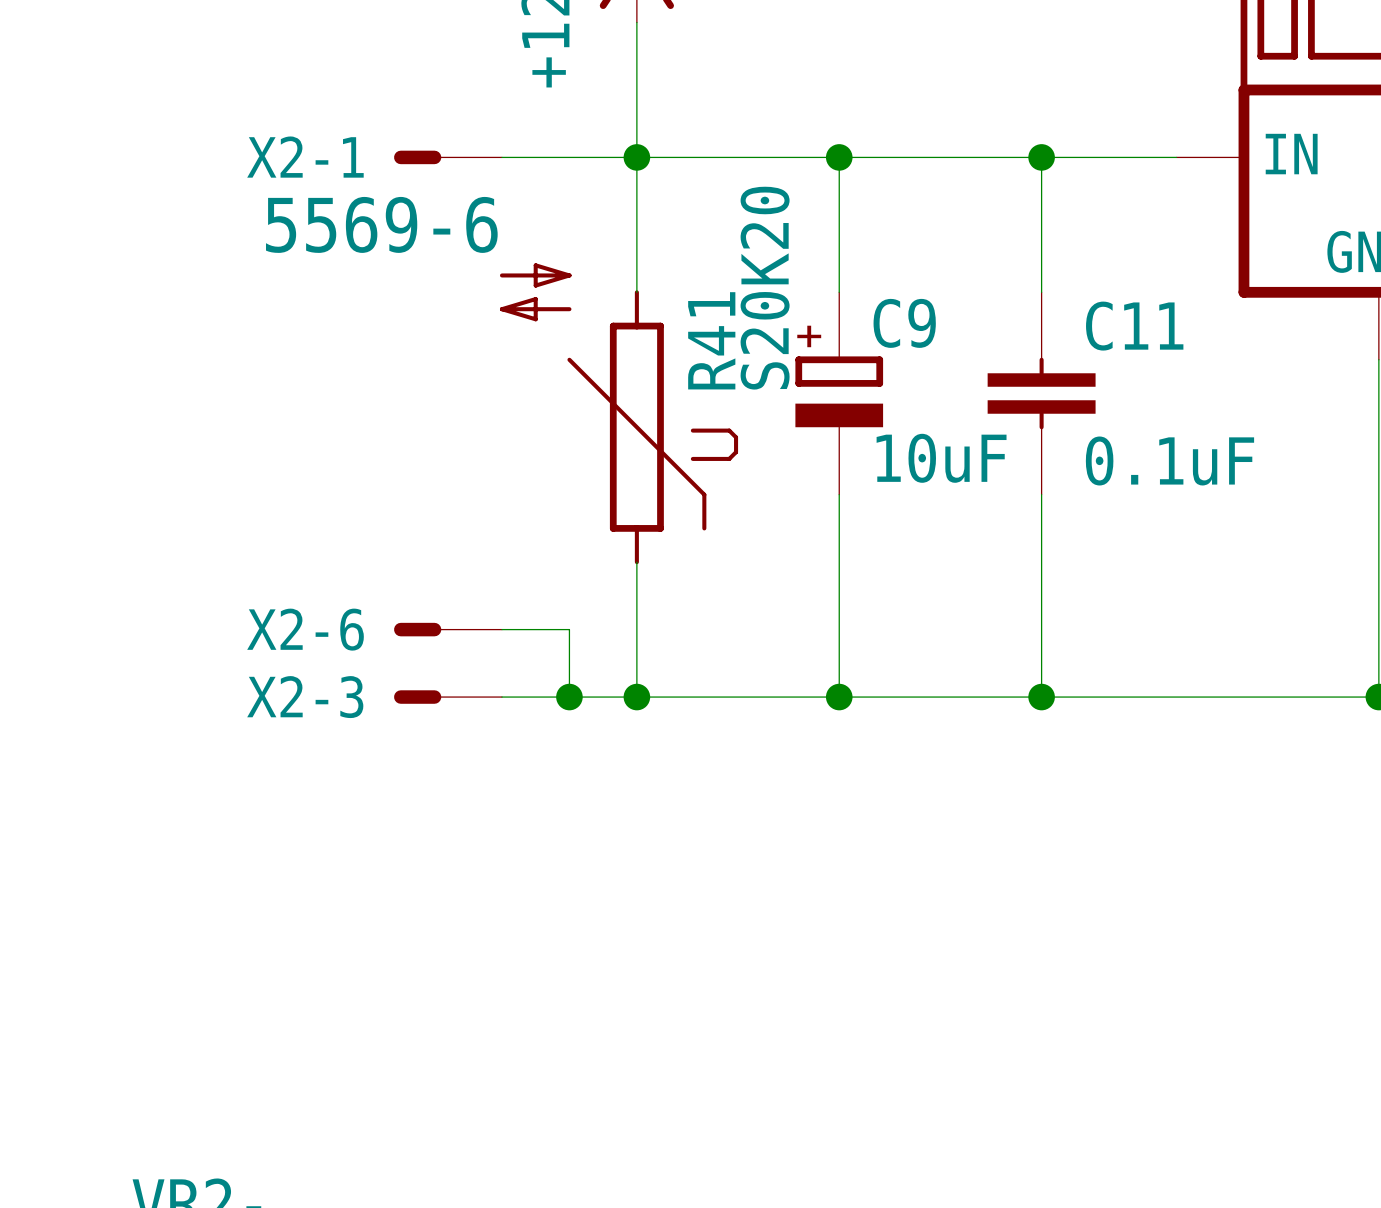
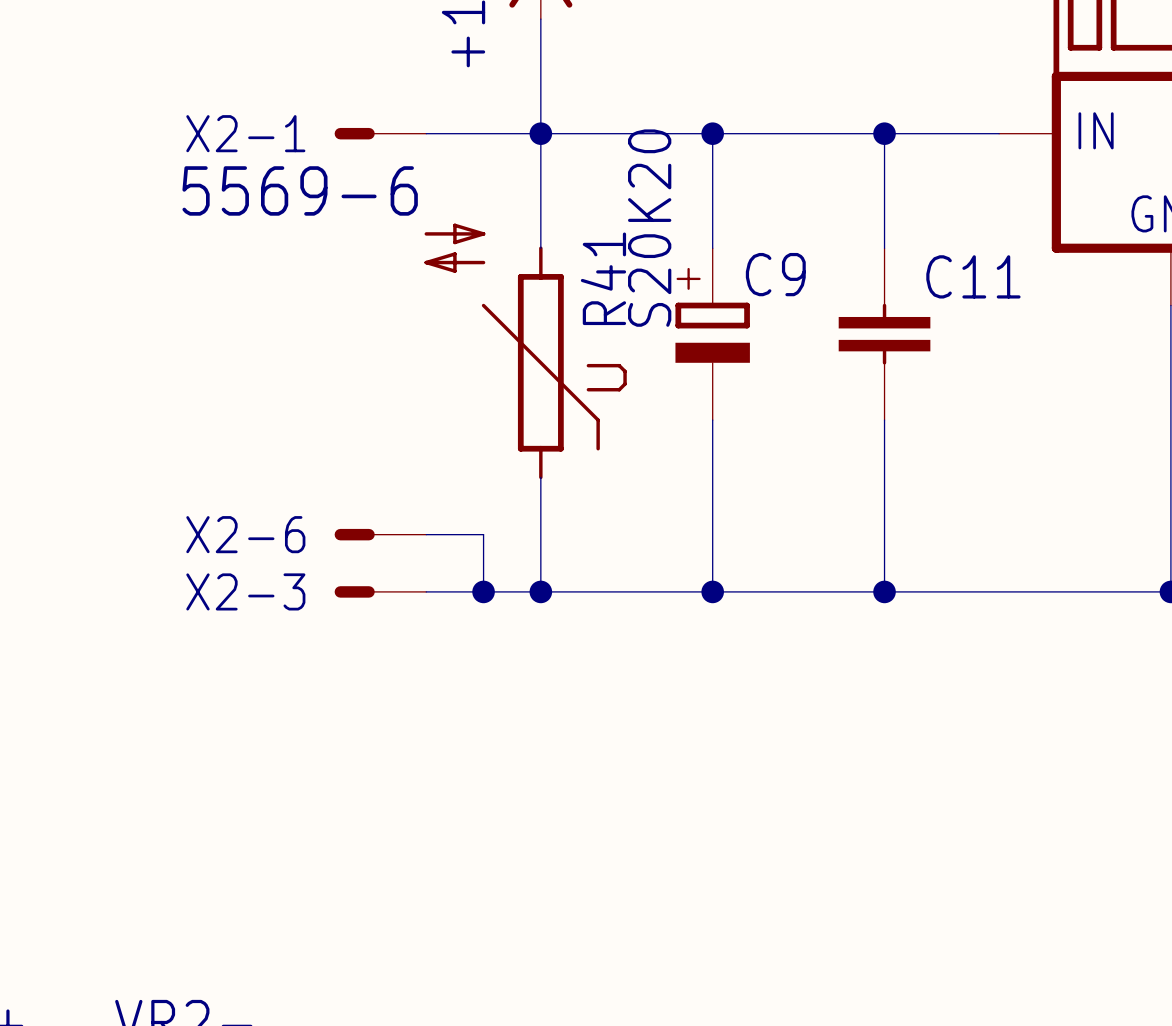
C9 value: 10uF (941, 458) -> none
C11 value: 0.1uF (1169, 460) -> none

